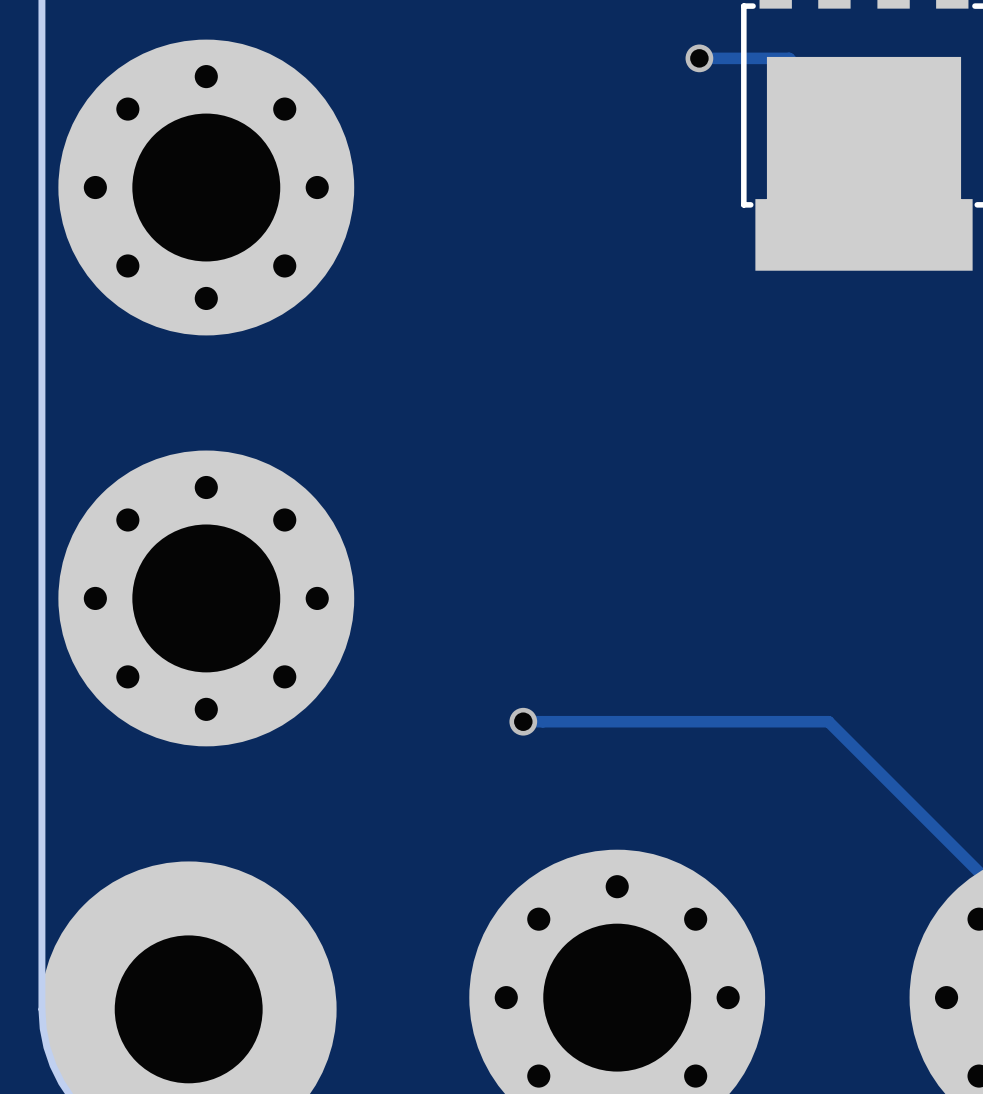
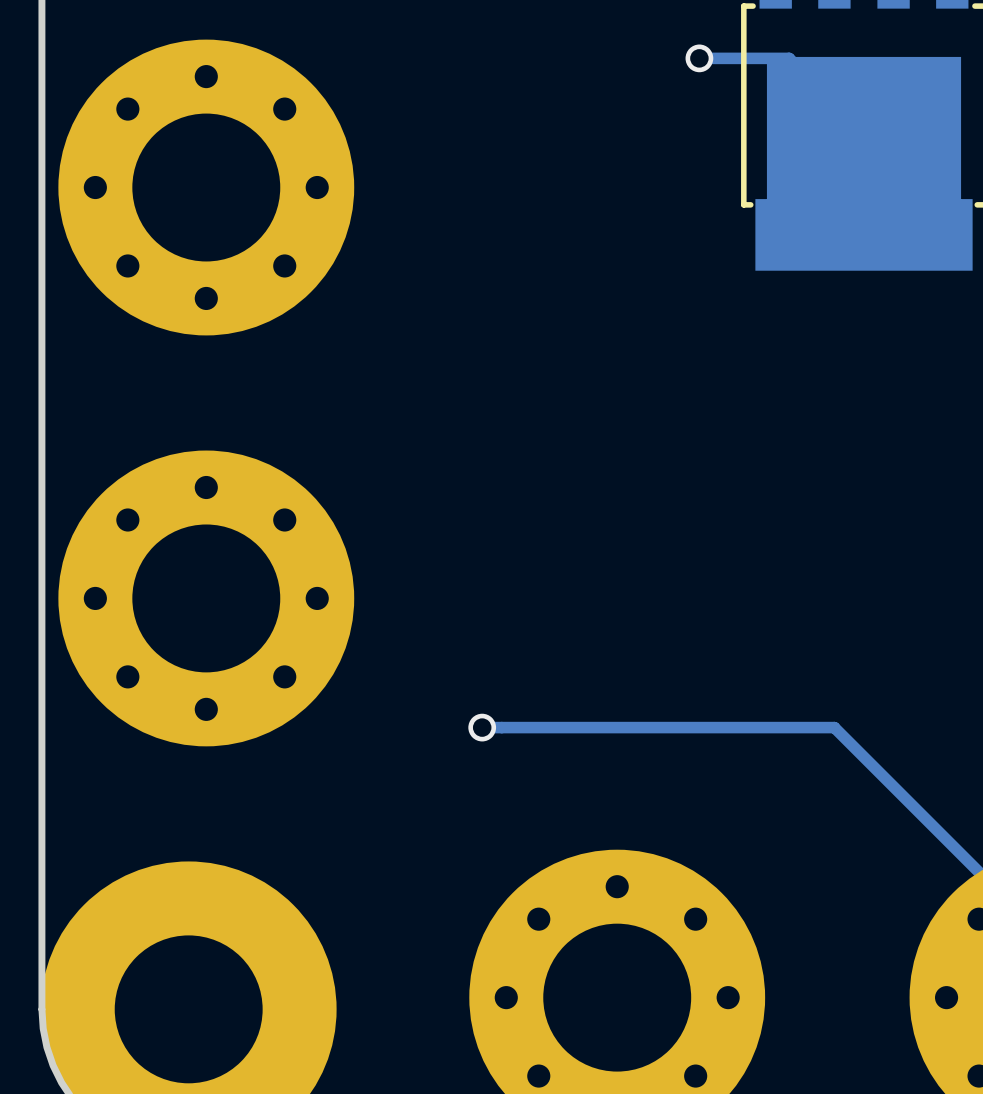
track: (523, 721) (828, 721) (834, 727) -> (482, 727) (834, 727)
via position: (523, 721) -> (482, 727)

